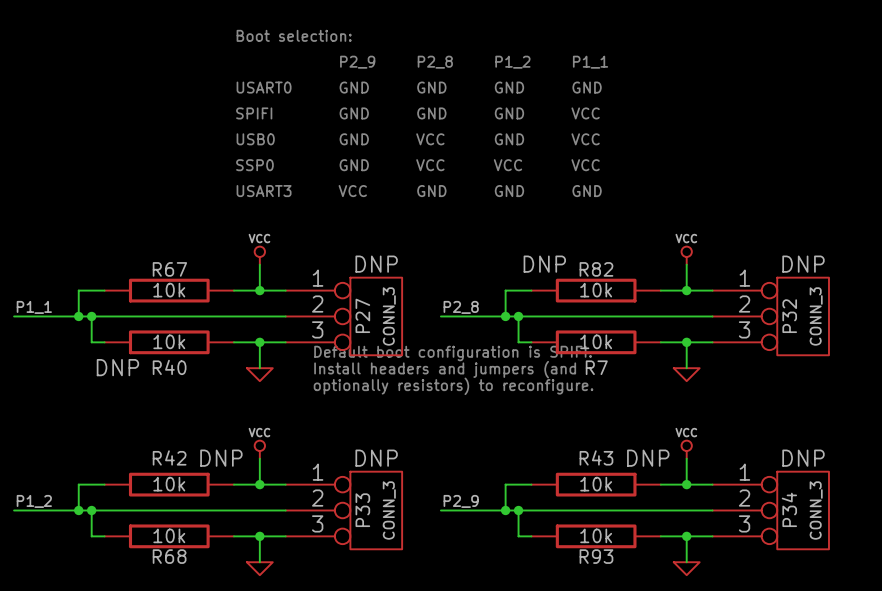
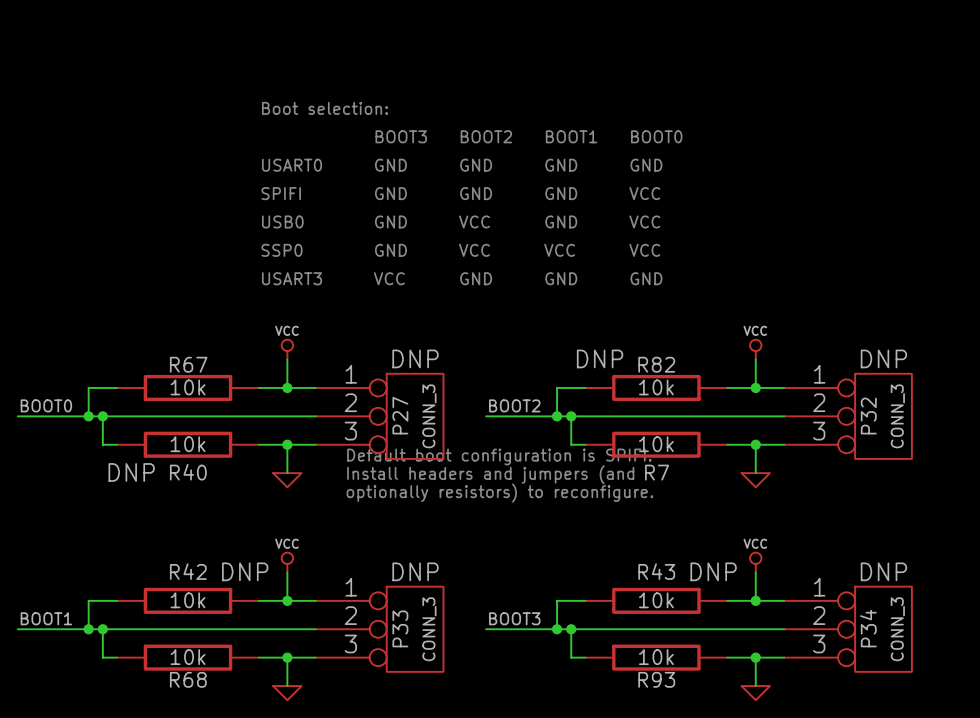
text: P2_9 (357, 62) -> BOOT3 (401, 136)
text: P2_8 (435, 62) -> BOOT2 (486, 136)
text: P1_2 (512, 62) -> BOOT1 (571, 136)
text: P1_1 (590, 62) -> BOOT0 (656, 136)
label: P1_1 (34, 307) -> BOOT0 (46, 405)
label: P2_8 (461, 307) -> BOOT2 (514, 405)
label: P1_2 (34, 501) -> BOOT1 (46, 618)
label: P2_9 (461, 501) -> BOOT3 (514, 618)

